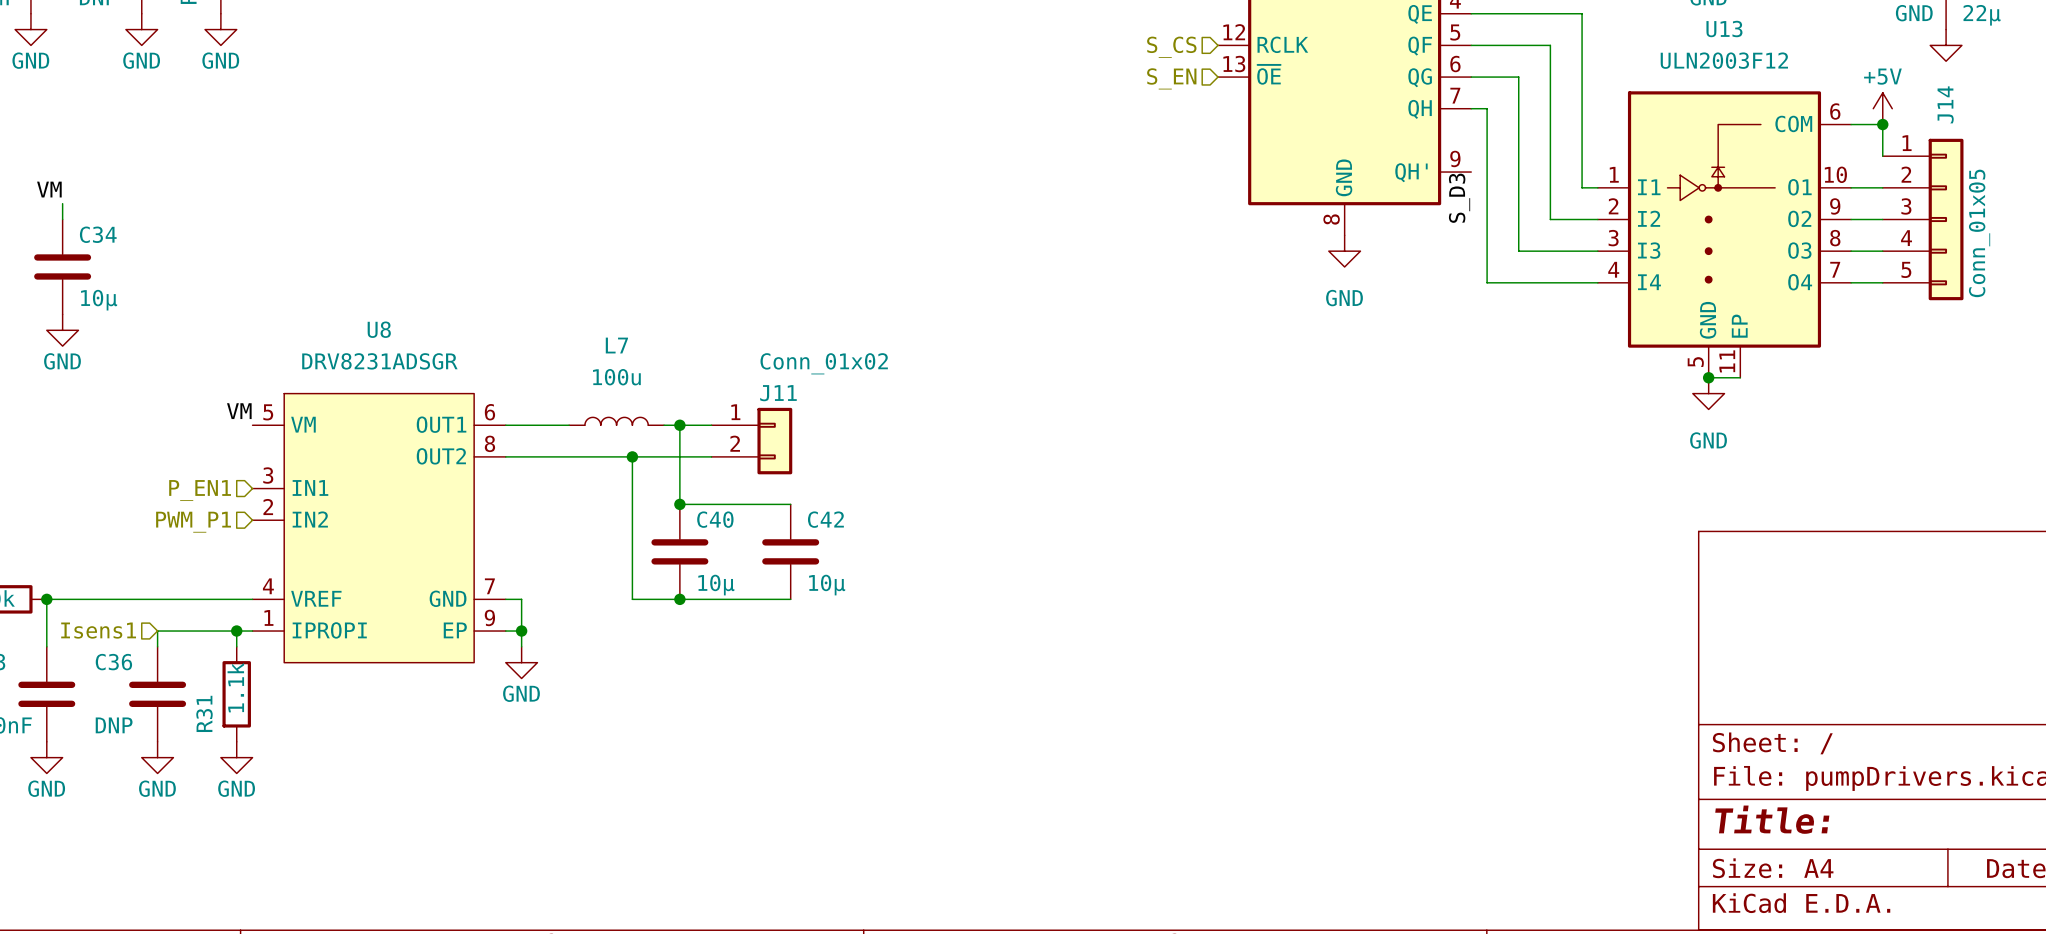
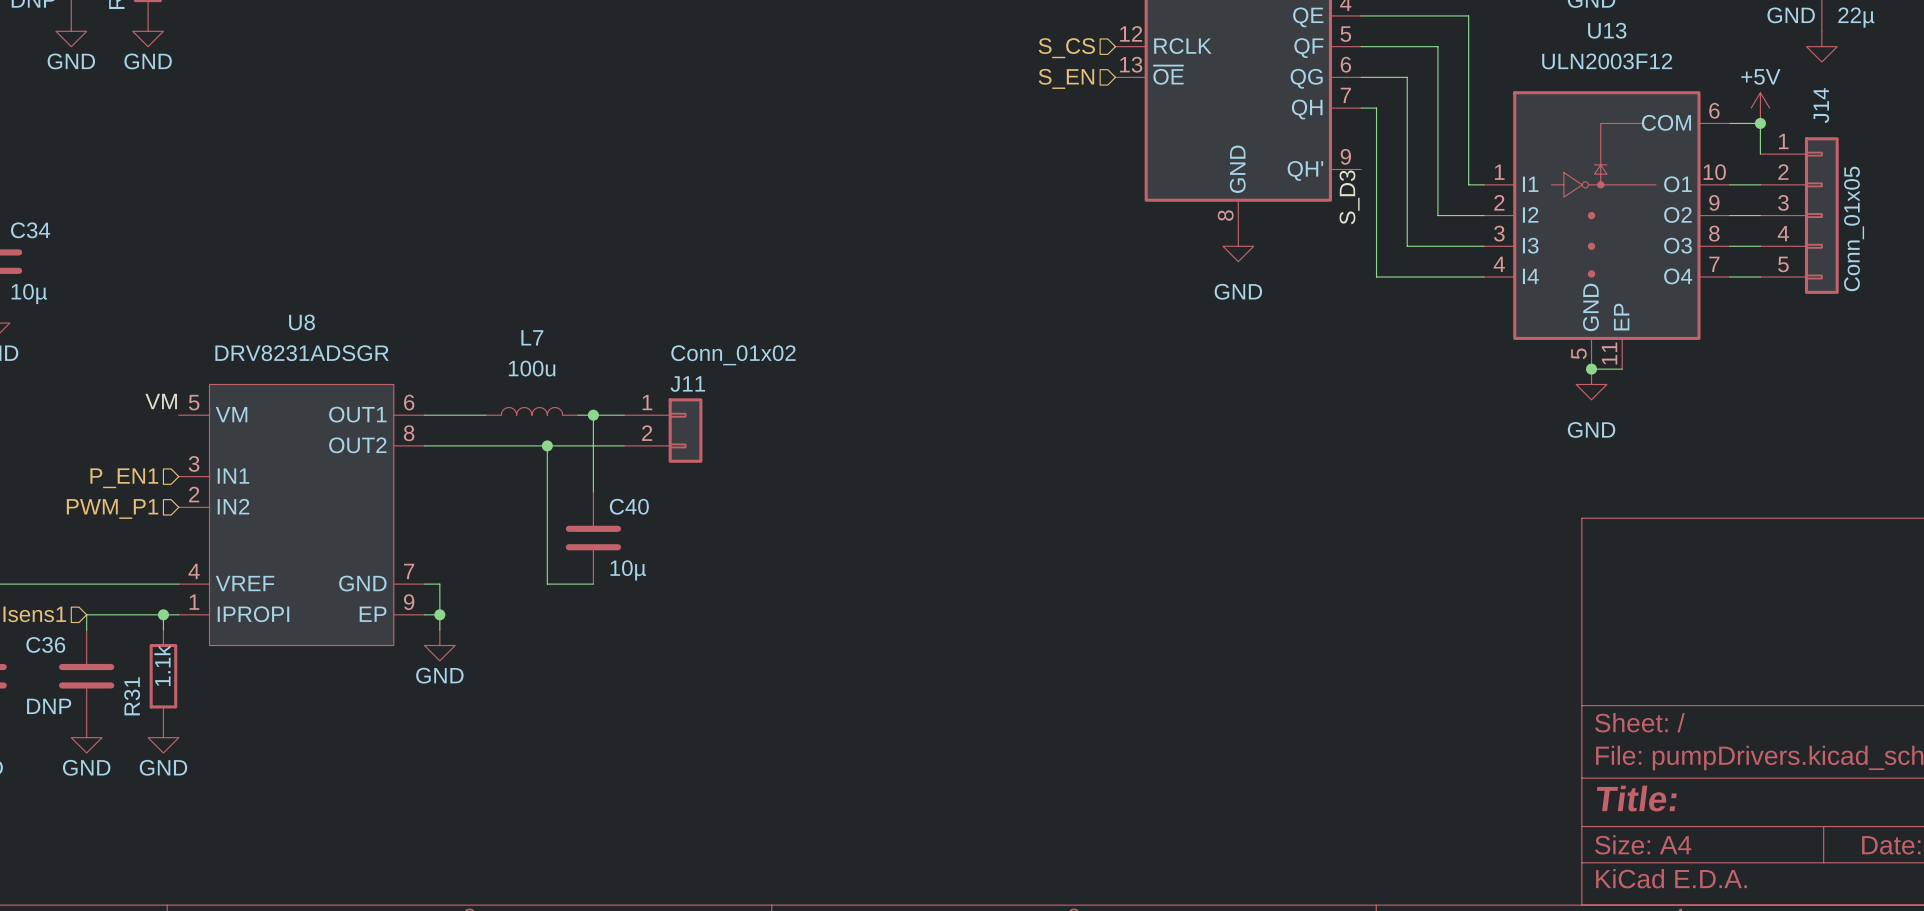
wire: (679, 504) (790, 504) -> none
junction: (679, 504) -> none
C42: 10µ (790, 551) -> none
wire: (679, 599) (790, 599) -> none
junction: (679, 599) -> none

